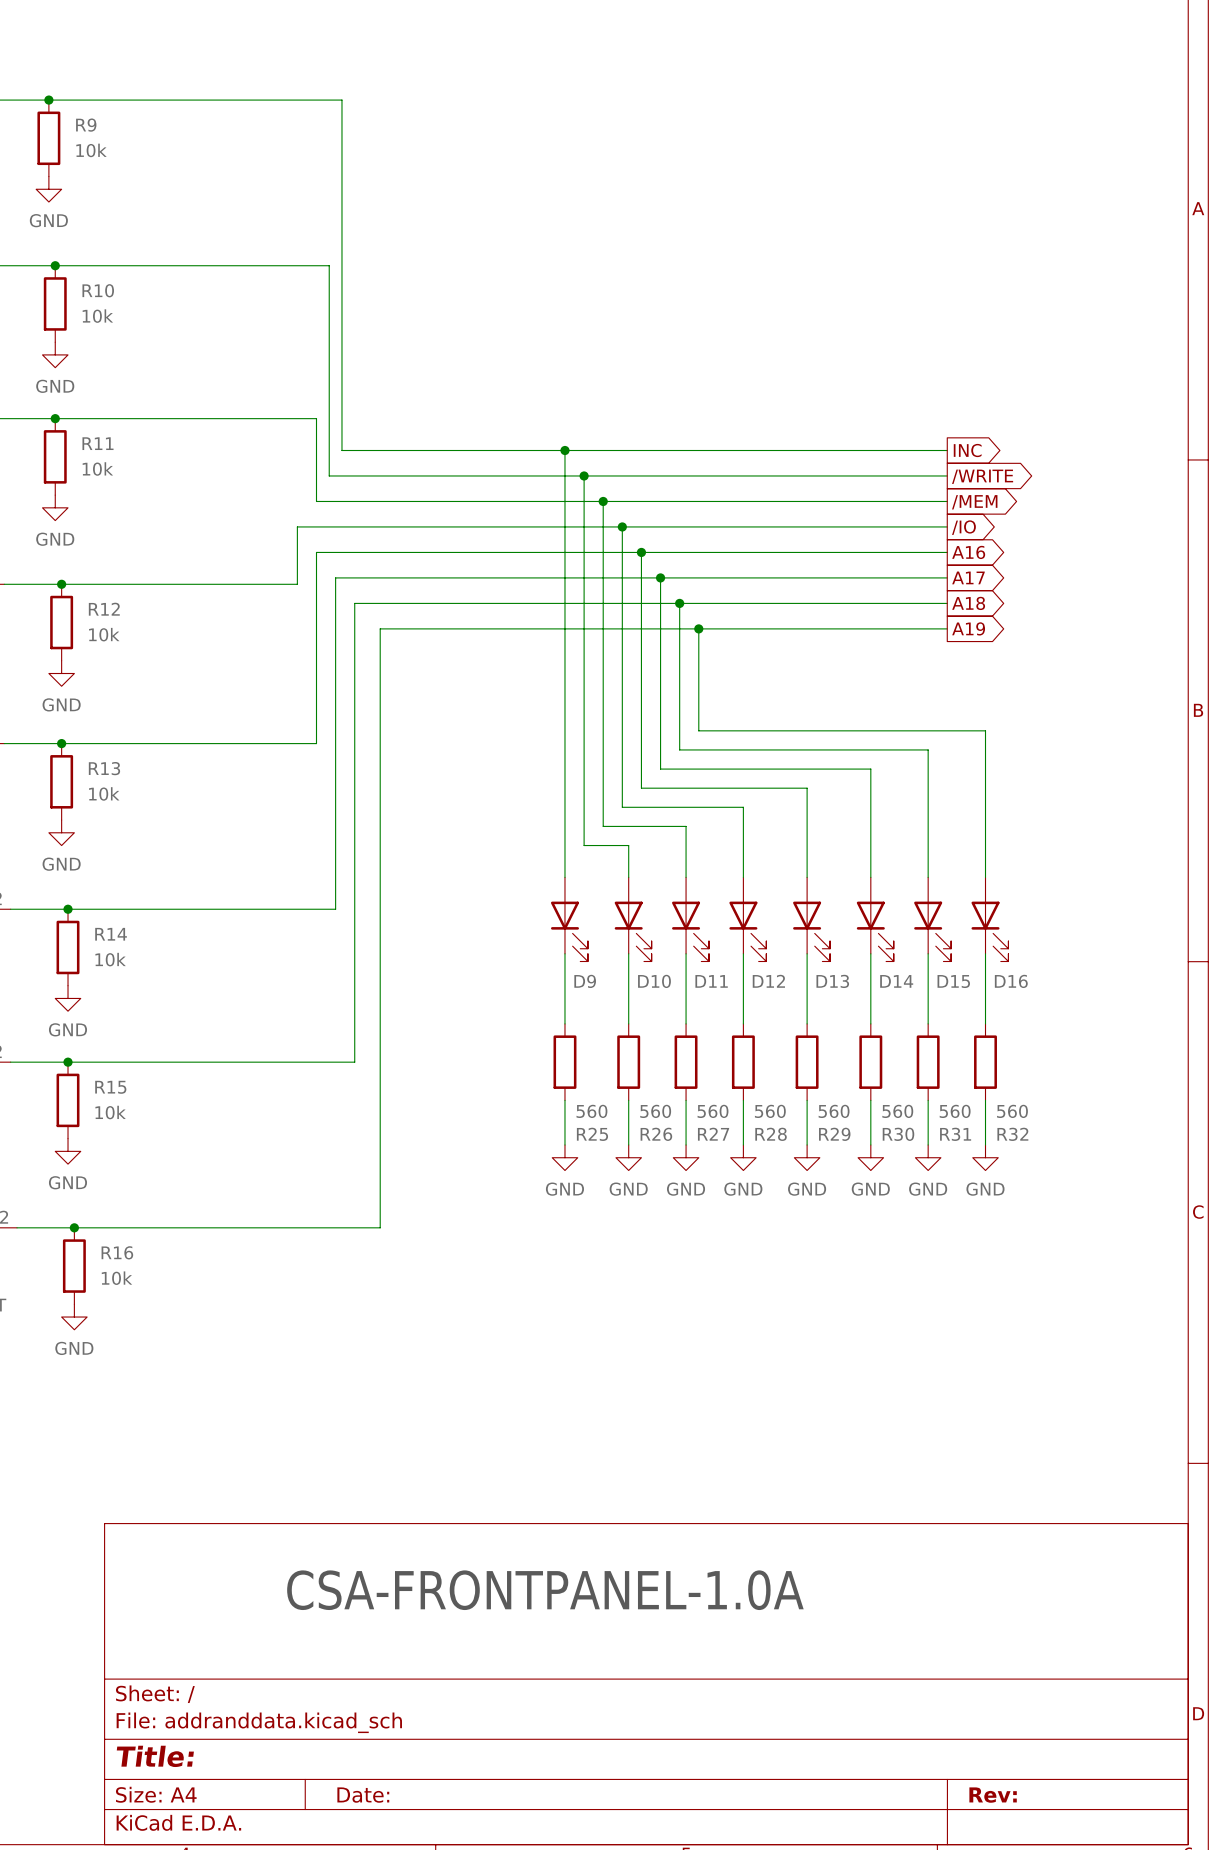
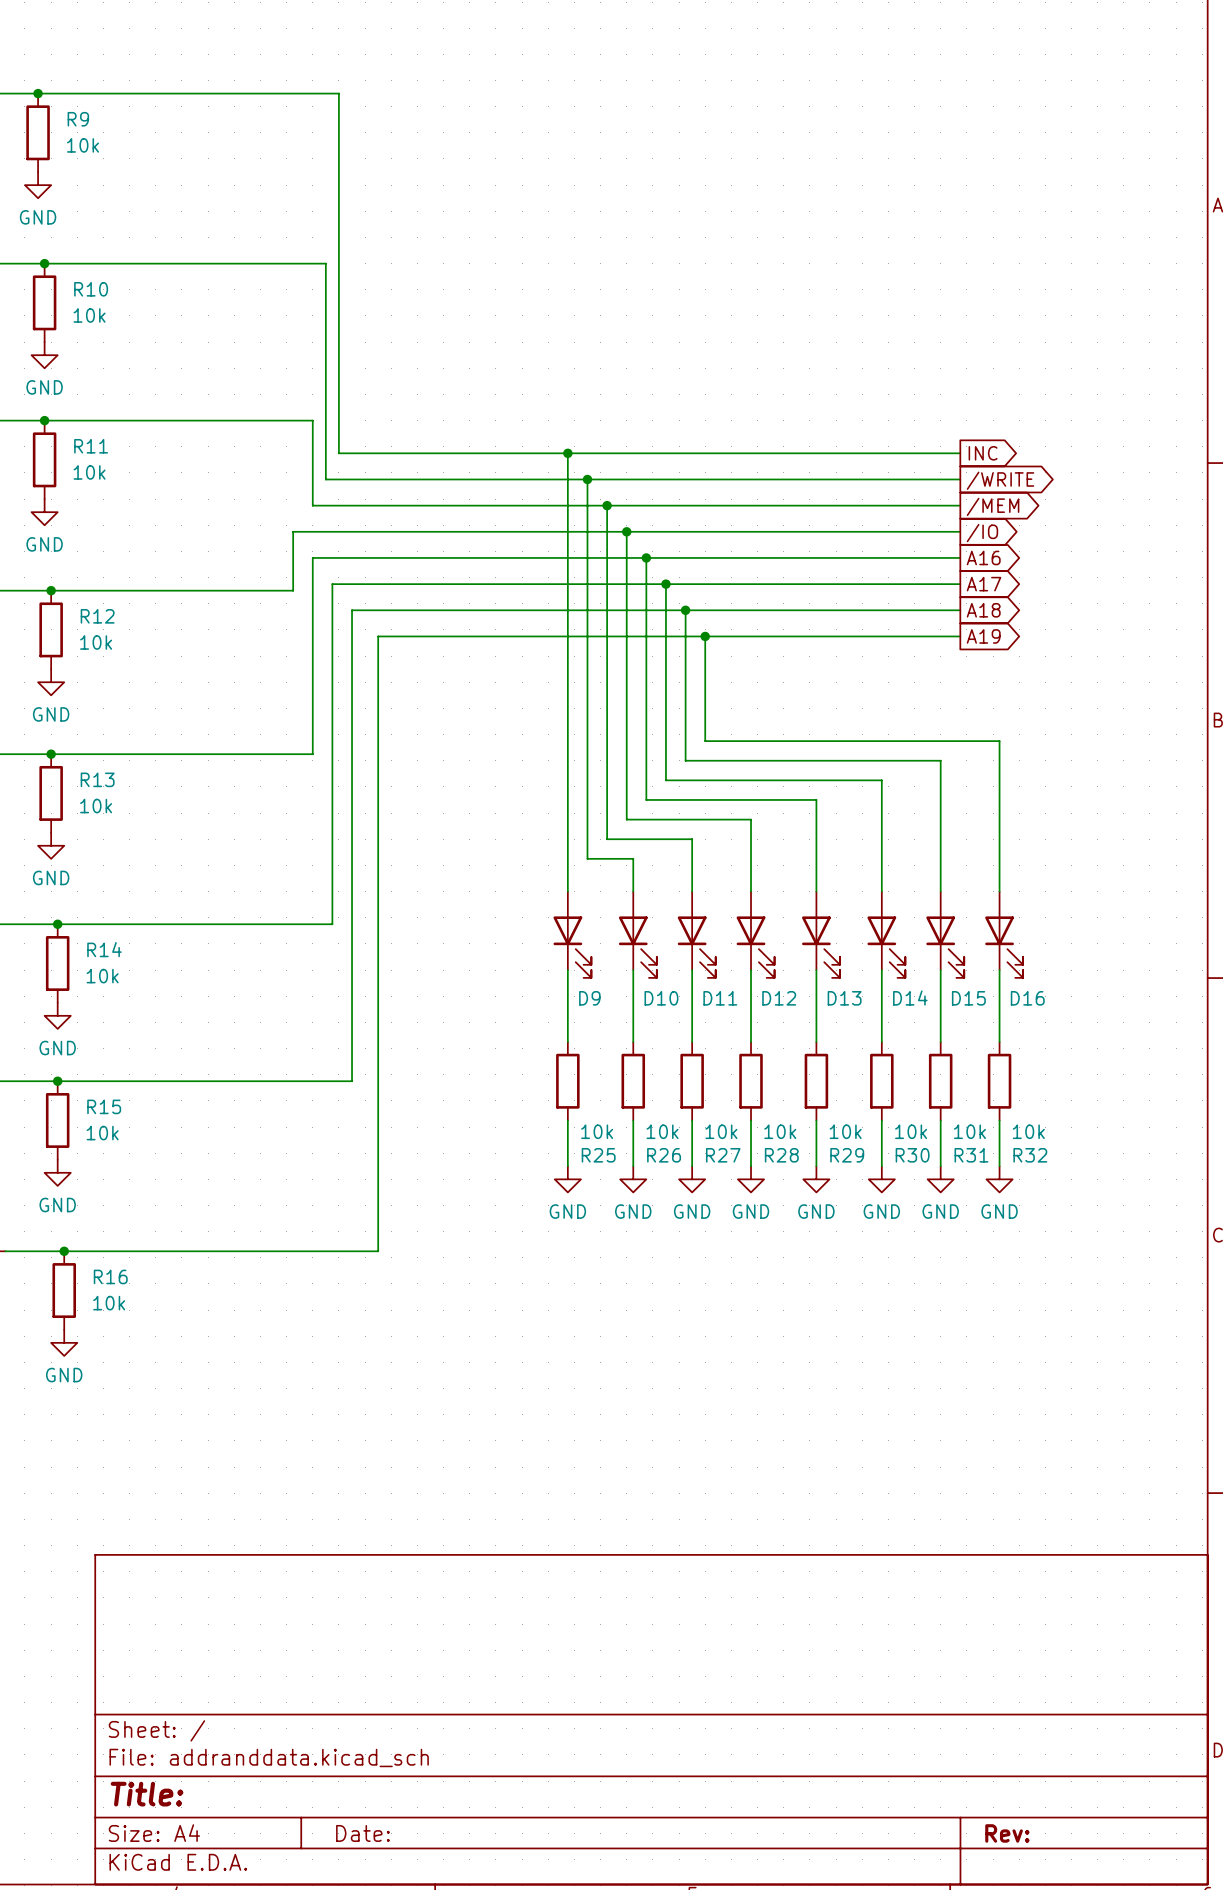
R25 value: 560 (591, 1111) -> 10k (597, 1131)
R26 value: 560 (655, 1111) -> 10k (662, 1131)
R27 value: 560 (713, 1111) -> 10k (721, 1131)
R28 value: 560 (770, 1111) -> 10k (780, 1131)
R29 value: 560 (834, 1111) -> 10k (845, 1131)
R30 value: 560 (897, 1111) -> 10k (911, 1131)
R31 value: 560 (955, 1111) -> 10k (969, 1131)
R32 value: 560 (1012, 1111) -> 10k (1028, 1131)
text: CSA-FRONTPANEL-1.0A (545, 1590) -> none

